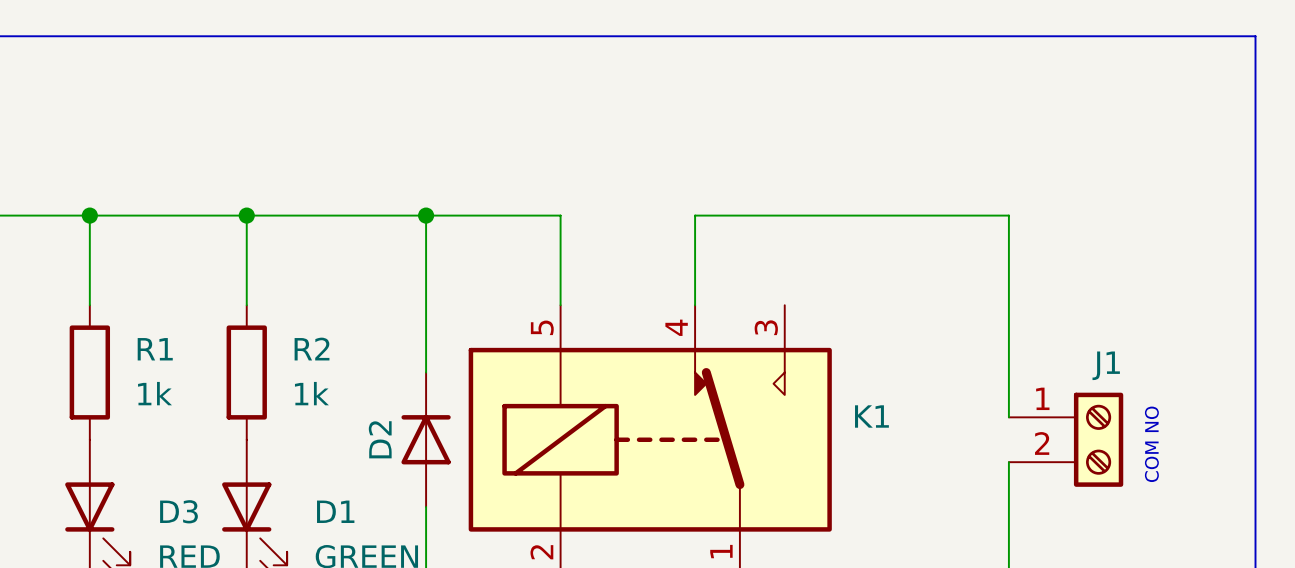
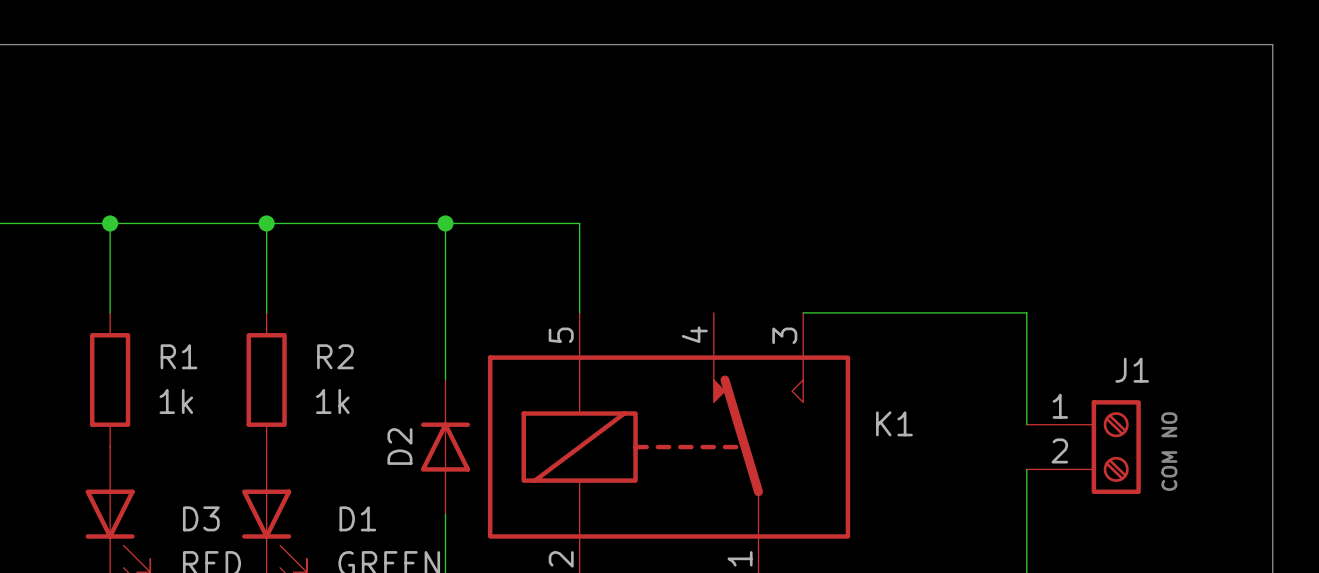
wire: (695, 305) (695, 215) (1008, 215) (1008, 305) -> (803, 312) (1026, 312)

